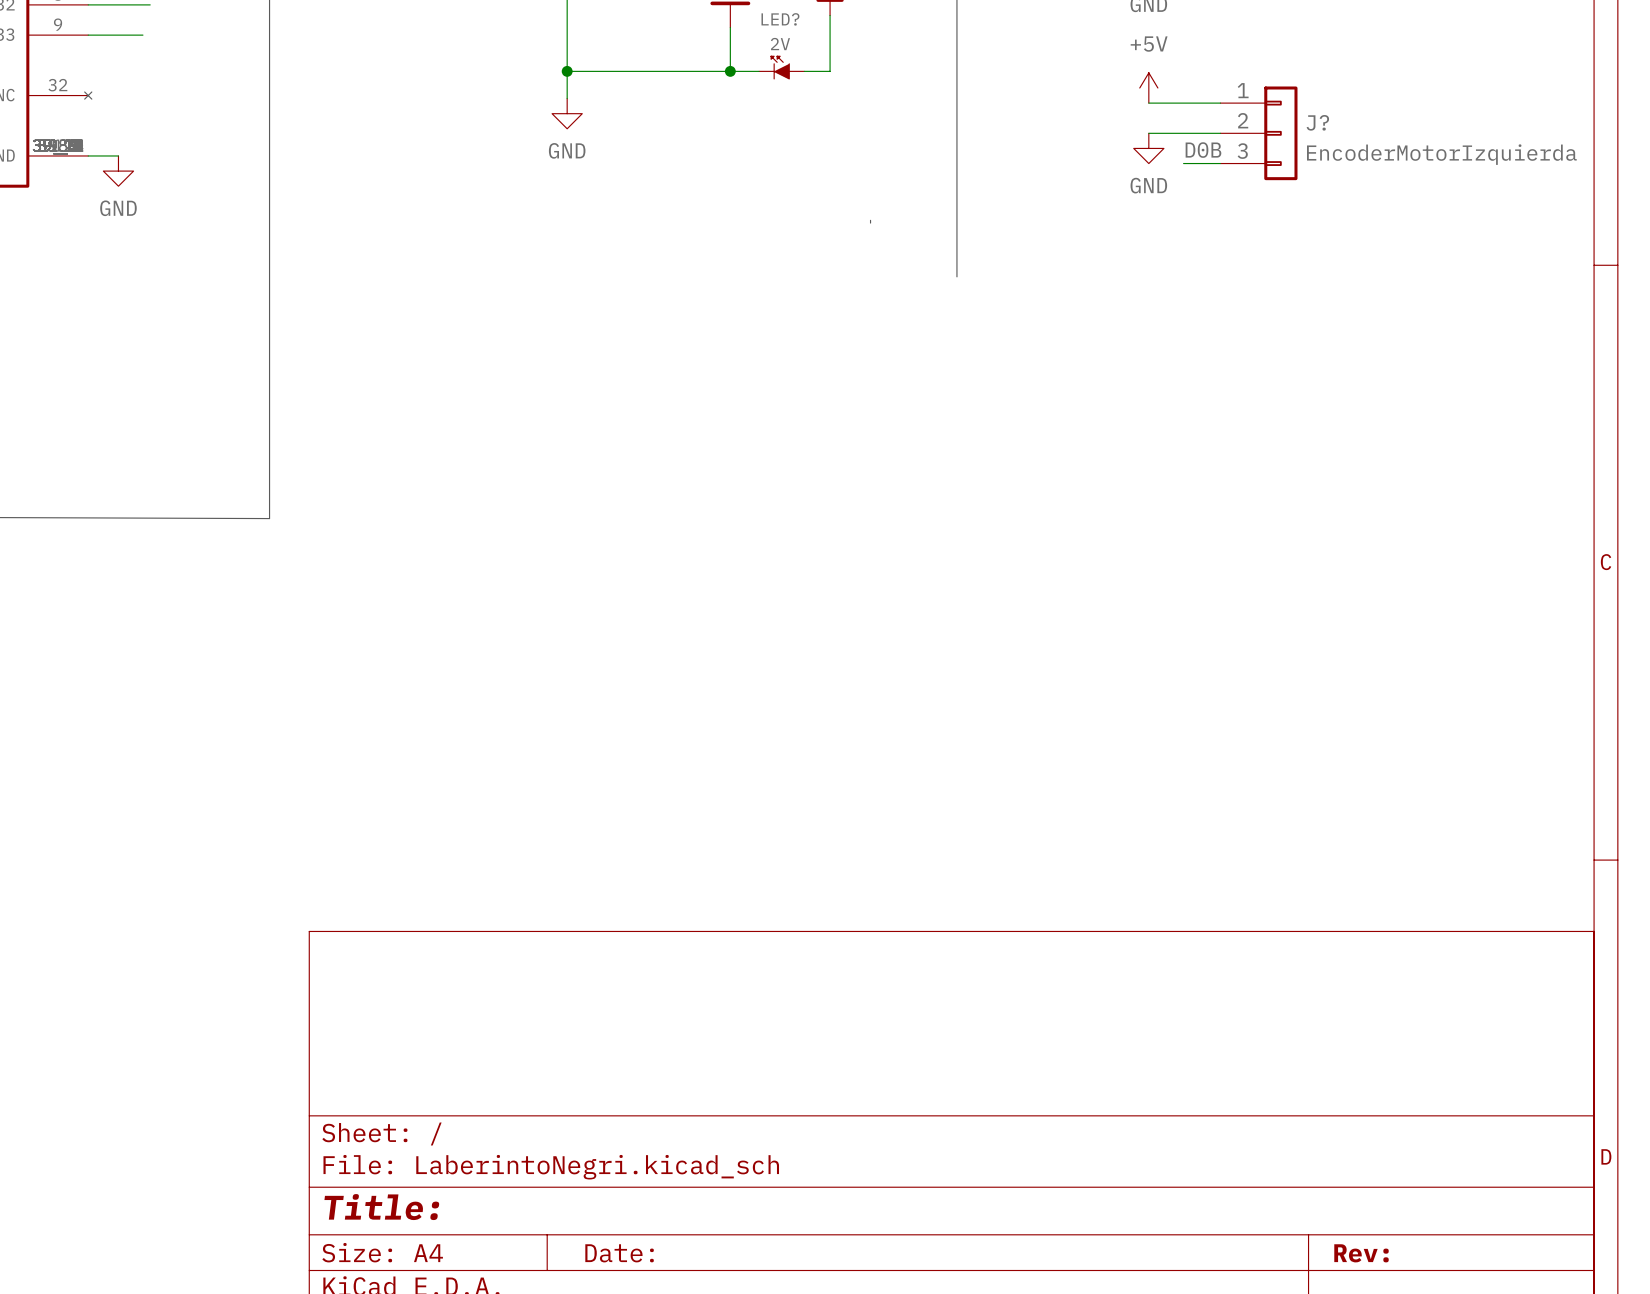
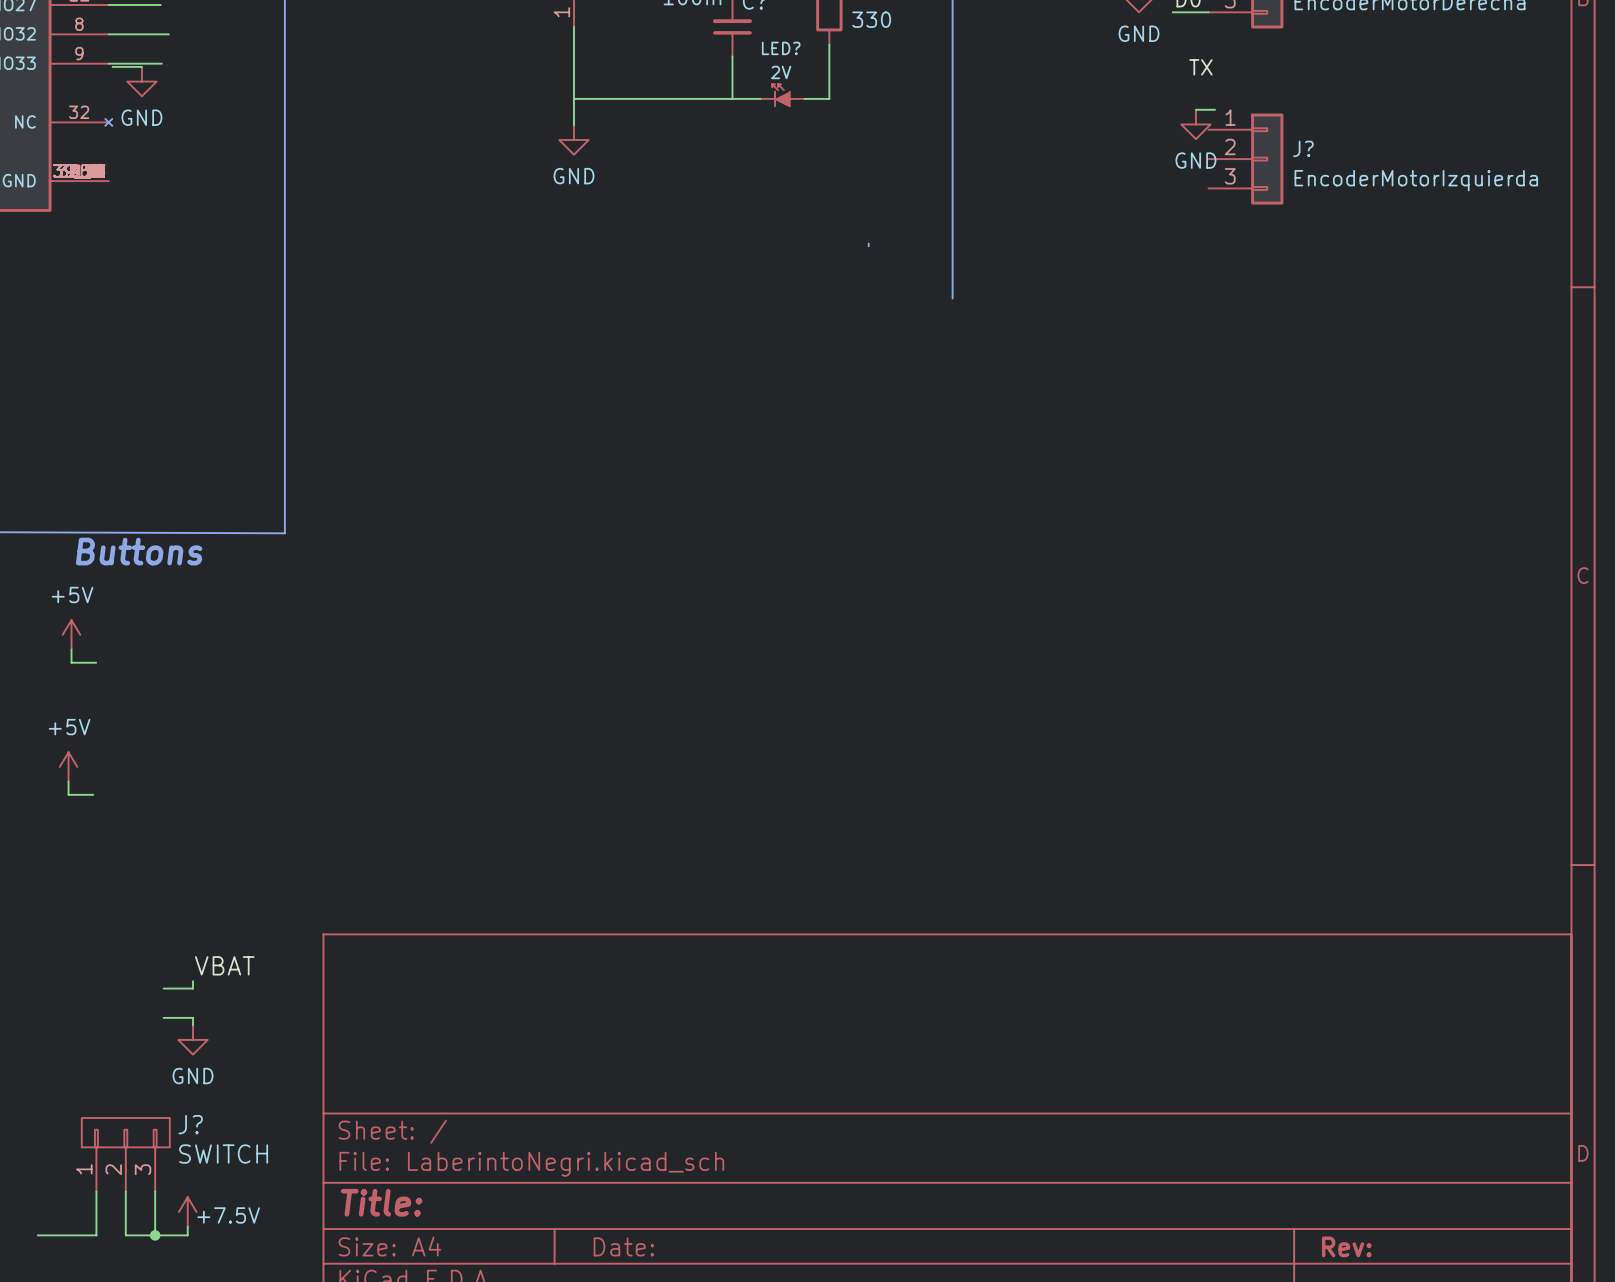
label: none -> TX (1200, 67)
junction: (567, 71) -> none
junction: (730, 71) -> none
wire: none -> (1195, 109) (1215, 109)
power symbol: +5V (1148, 88) -> none
wire: (1148, 103) (1220, 103) -> none
wire: (1148, 133) (1220, 133) -> none
power symbol position: GND (1148, 148) -> GND (1195, 124)
label: D0B (1203, 150) -> none
wire: (88, 155) (118, 155) -> (112, 66) (141, 66)
wire: (1183, 163) (1220, 163) -> none
power symbol position: GND (118, 171) -> GND (141, 81)
text: none -> Buttons (139, 551)
power symbol: none -> +5V (71, 634)
wire: none -> (71, 649) (71, 662) (96, 662)
power symbol: none -> +5V (68, 766)
wire: none -> (68, 781) (68, 794) (93, 794)
label: none -> VBAT (224, 965)
wire: none -> (193, 981) (193, 988) (163, 988)
wire: none -> (163, 1017) (193, 1017) (193, 1025)
power symbol: none -> GND (193, 1039)
J?: none -> SWITCH (125, 1154)
wire: none -> (96, 1191) (96, 1235) (37, 1235)
wire: none -> (125, 1191) (125, 1235) (187, 1235) (187, 1226)
wire: none -> (155, 1191) (155, 1235)
power symbol: none -> +7.5V (187, 1211)
junction: none -> (155, 1235)

